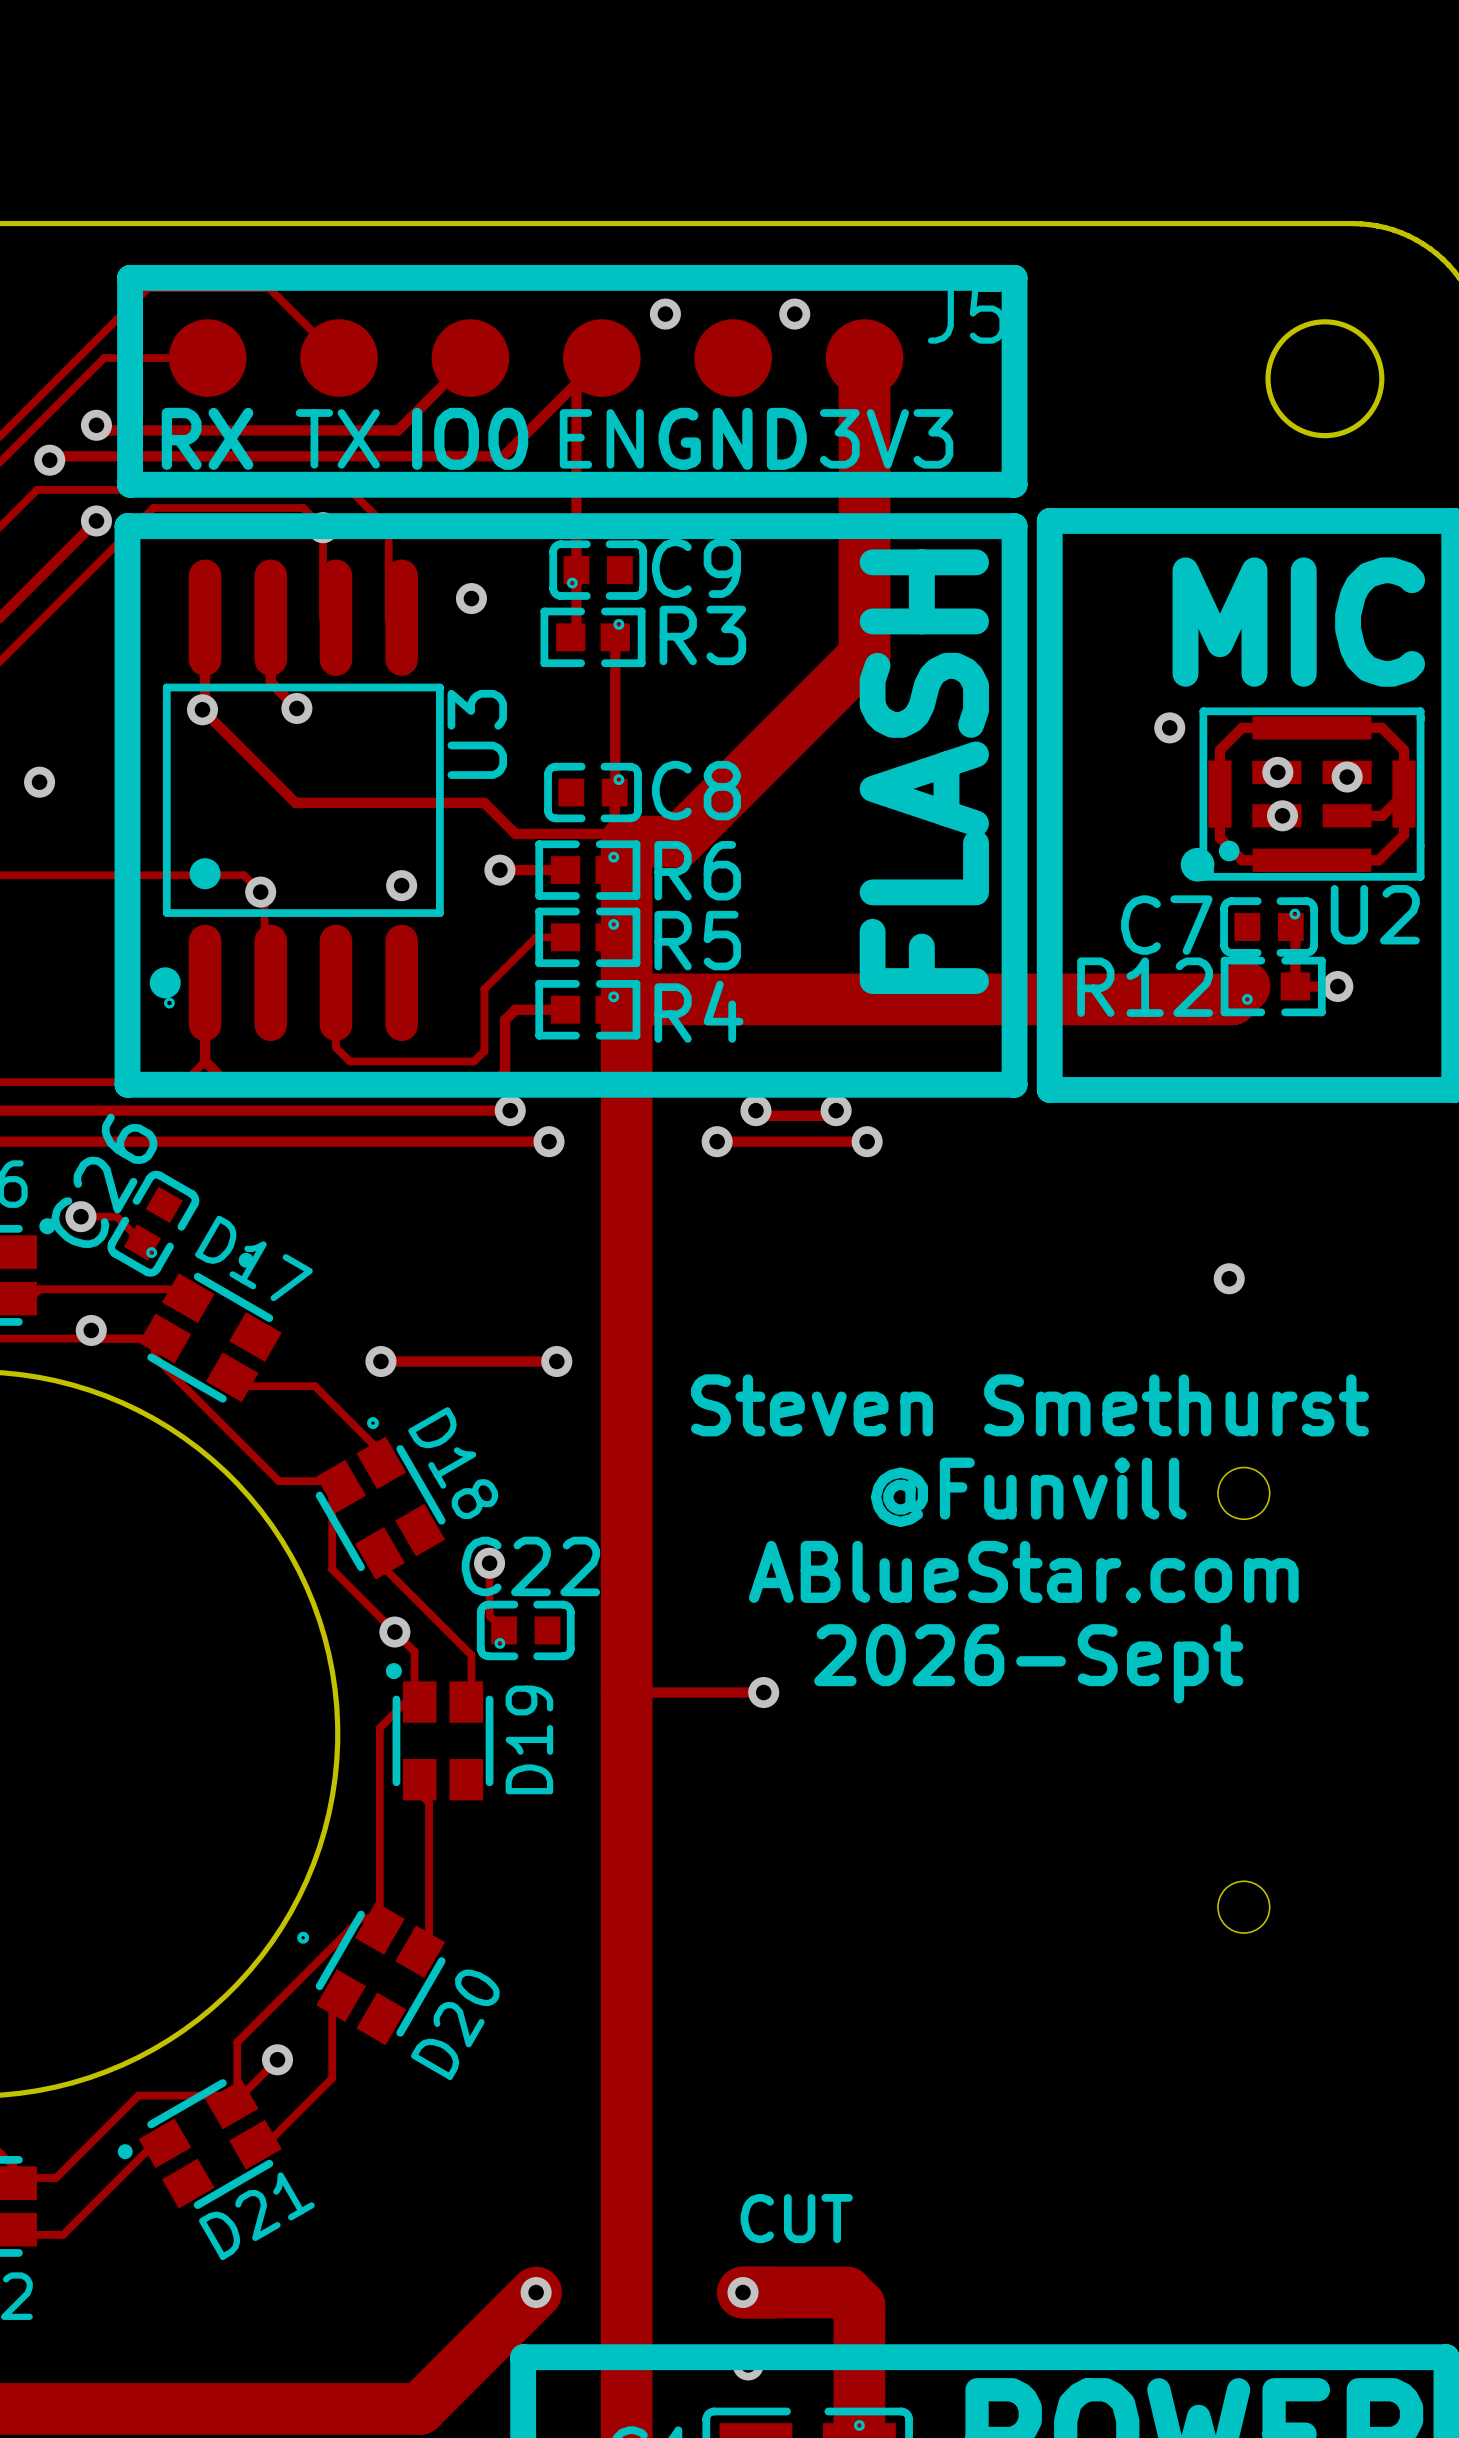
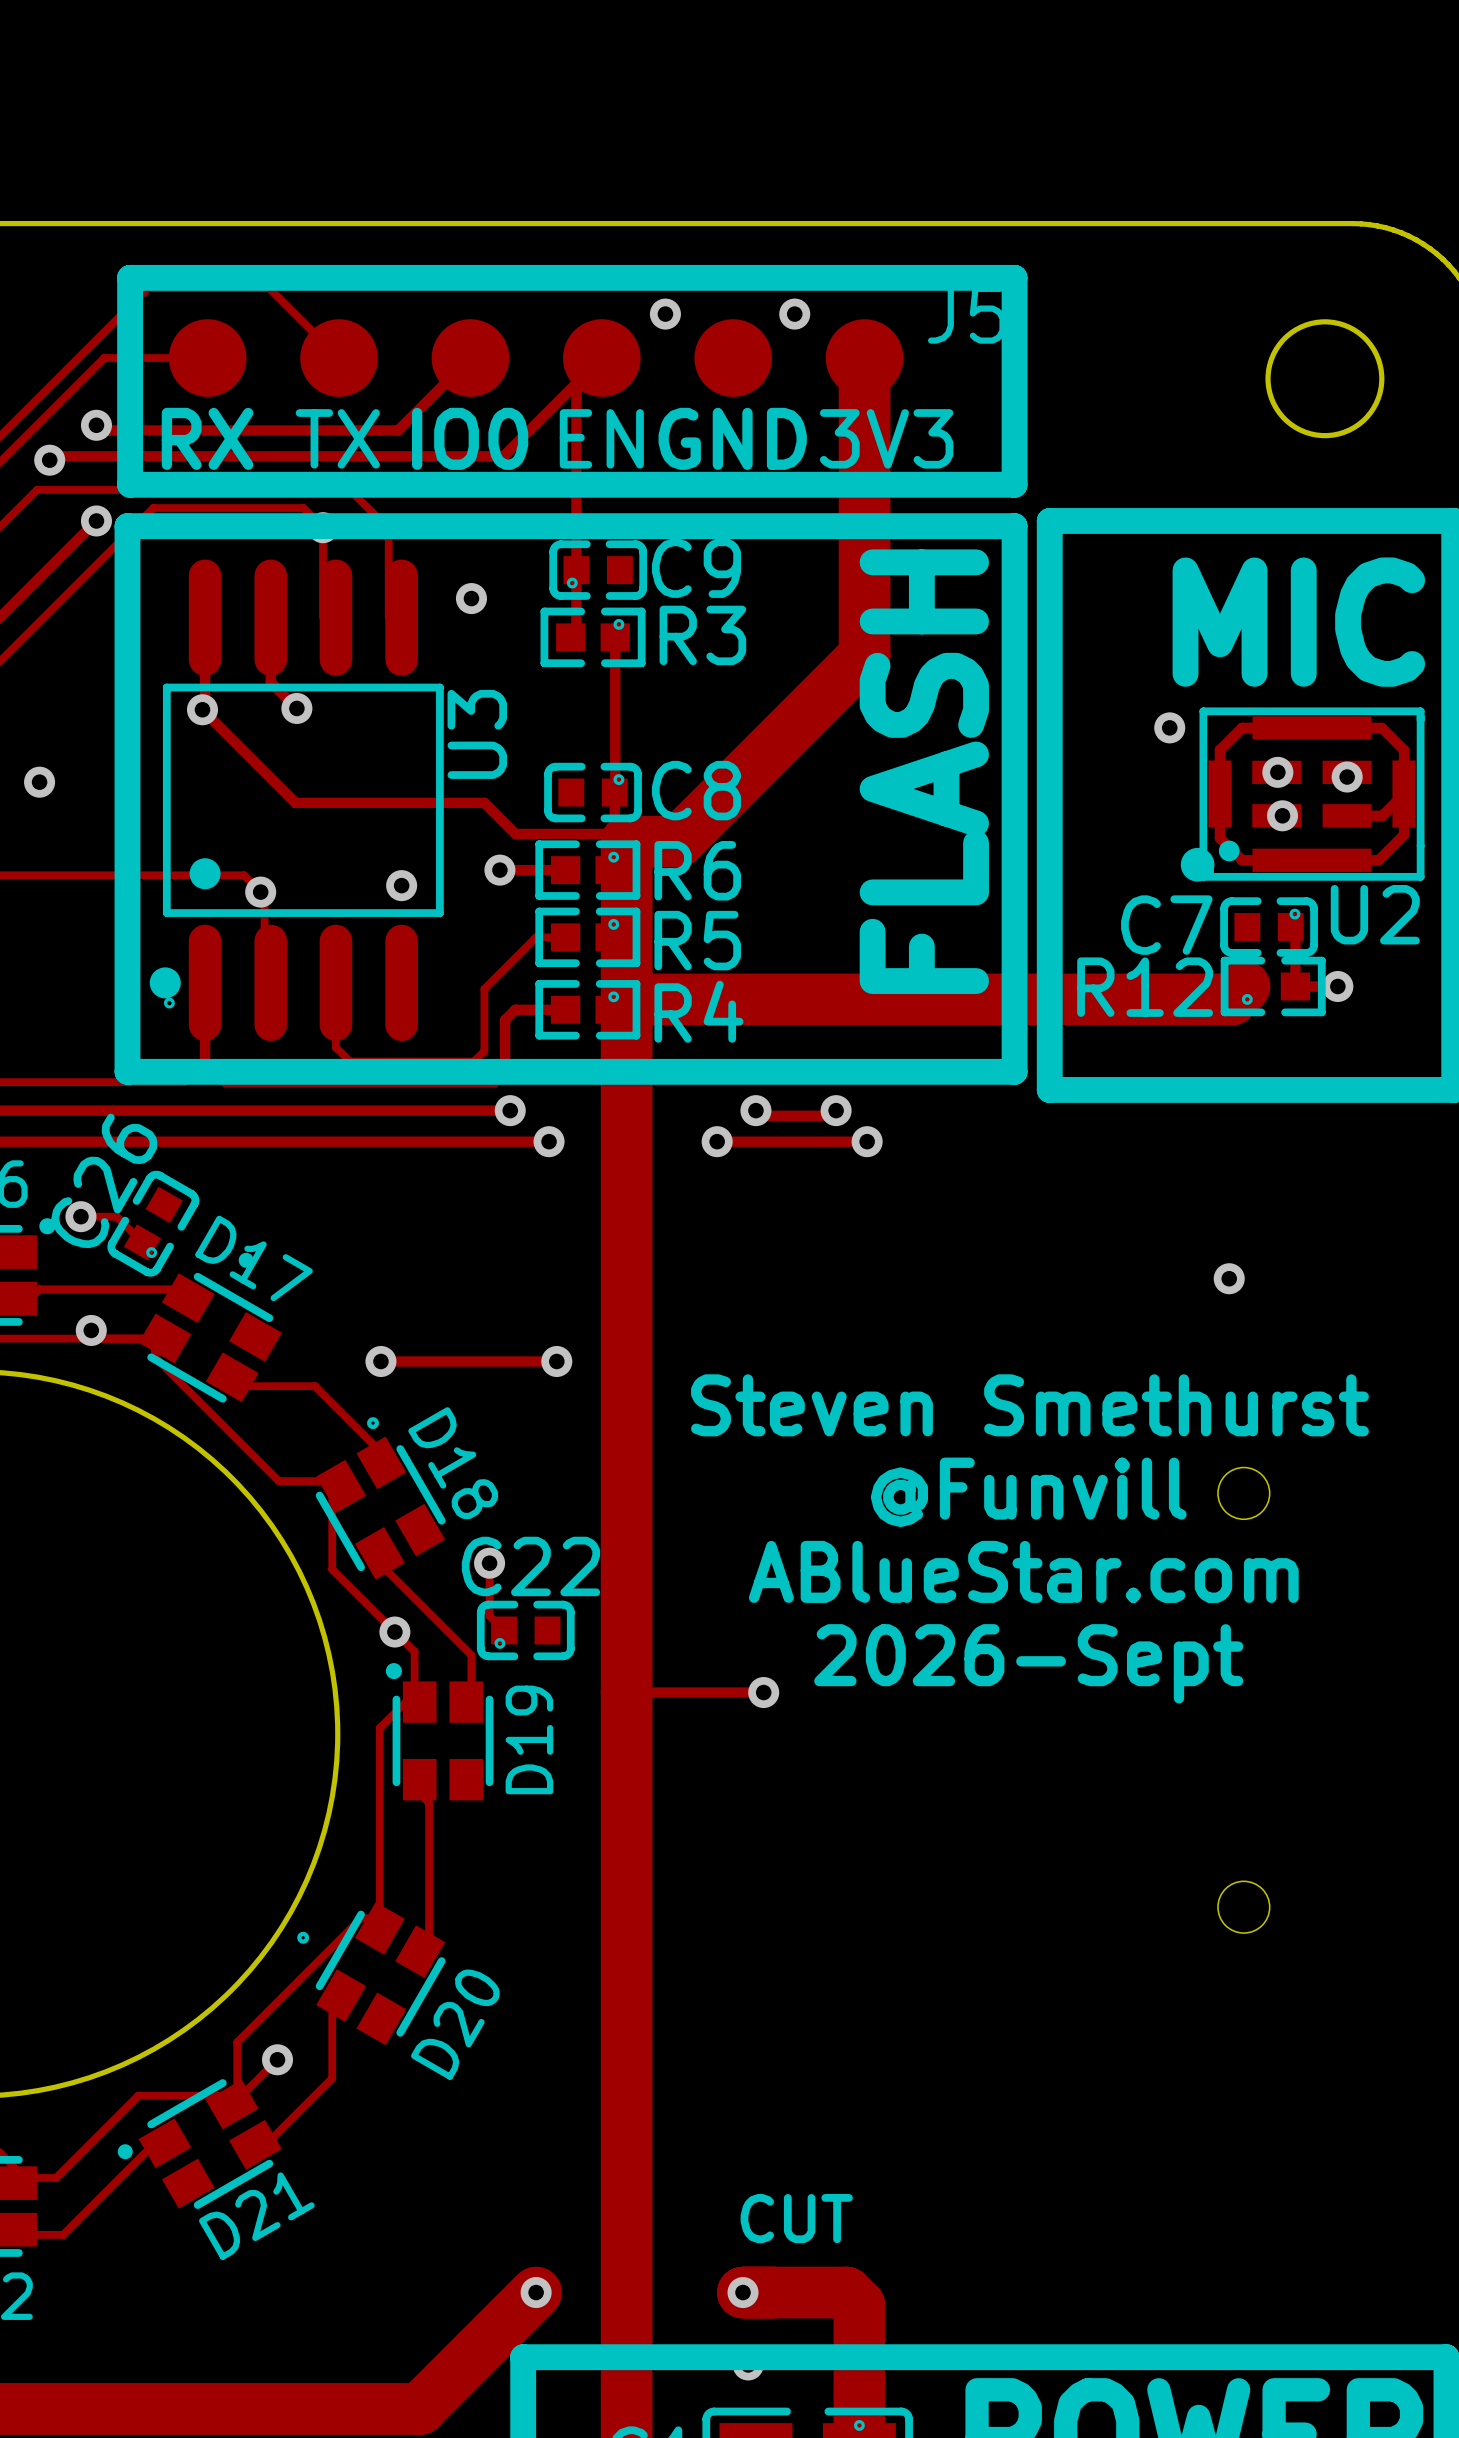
line: (127, 1071) (127, 1084) (1014, 1084) (1014, 1071) -> (127, 1071) (1014, 1071)

